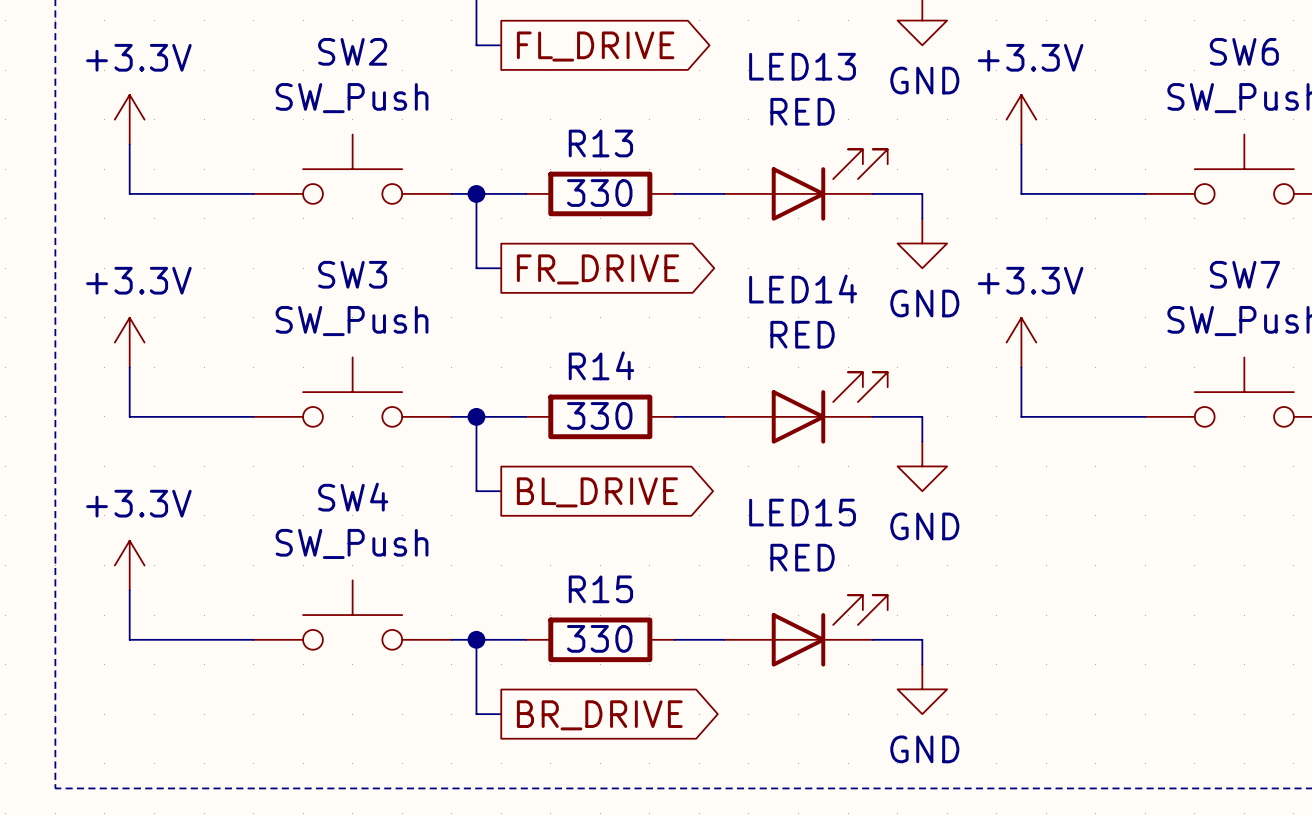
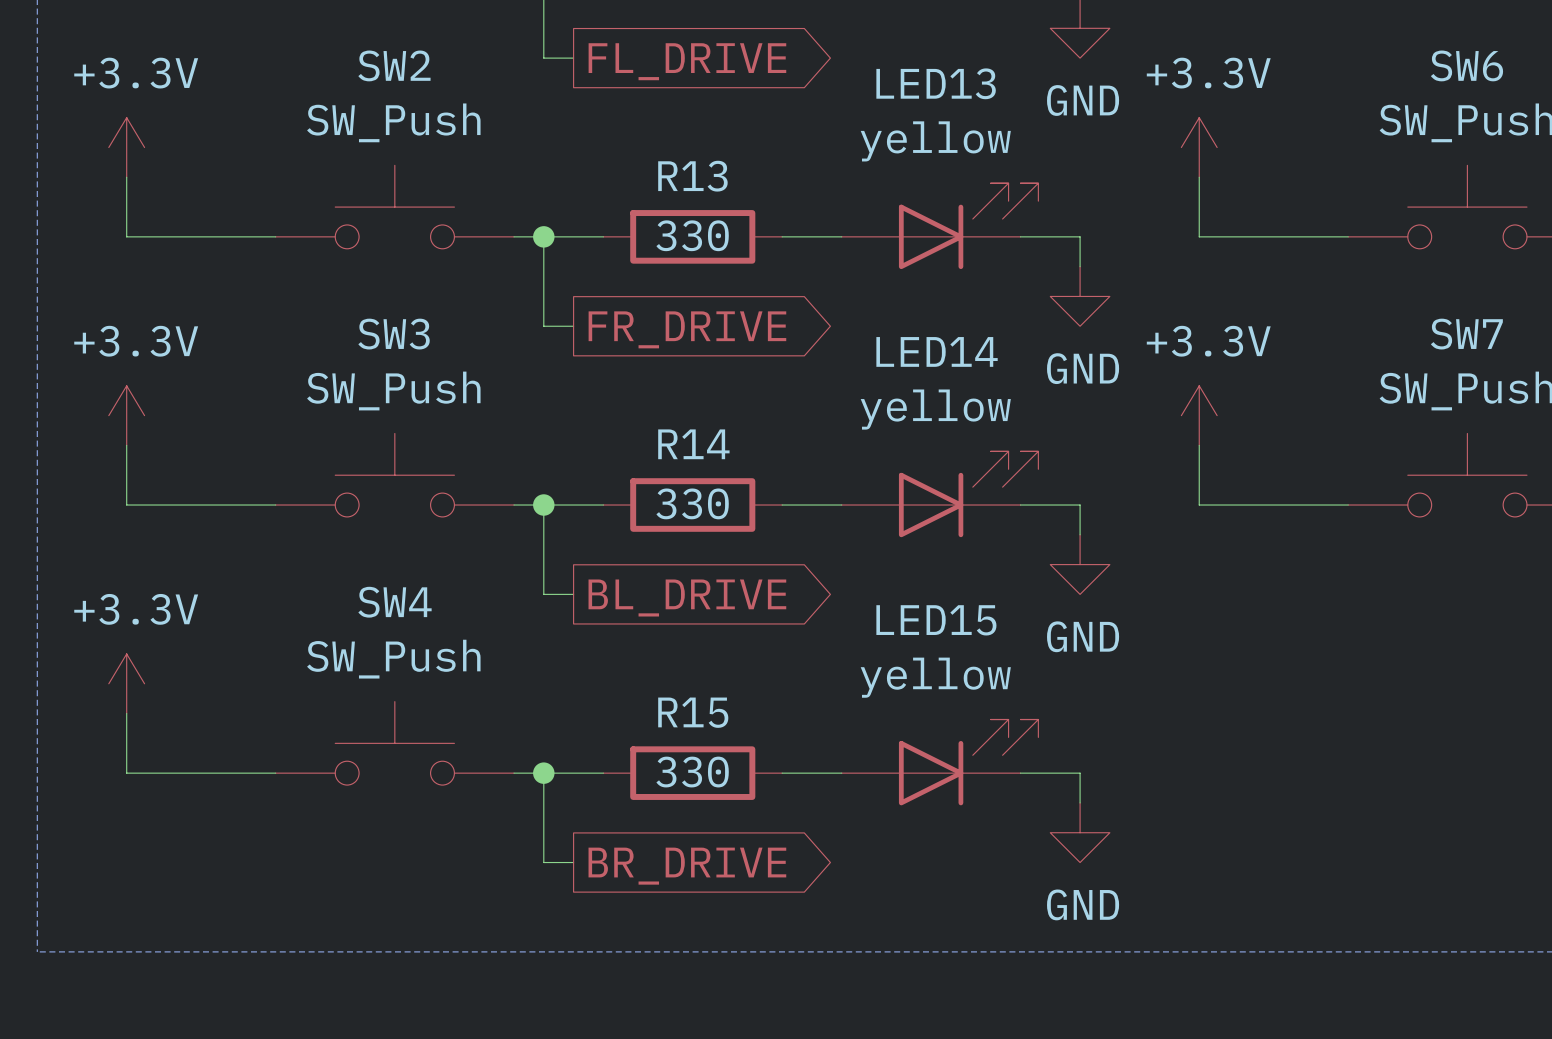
LED13 value: RED (802, 111) -> yellow (935, 141)
LED14 value: RED (802, 334) -> yellow (935, 409)
LED15 value: RED (802, 557) -> yellow (935, 677)

